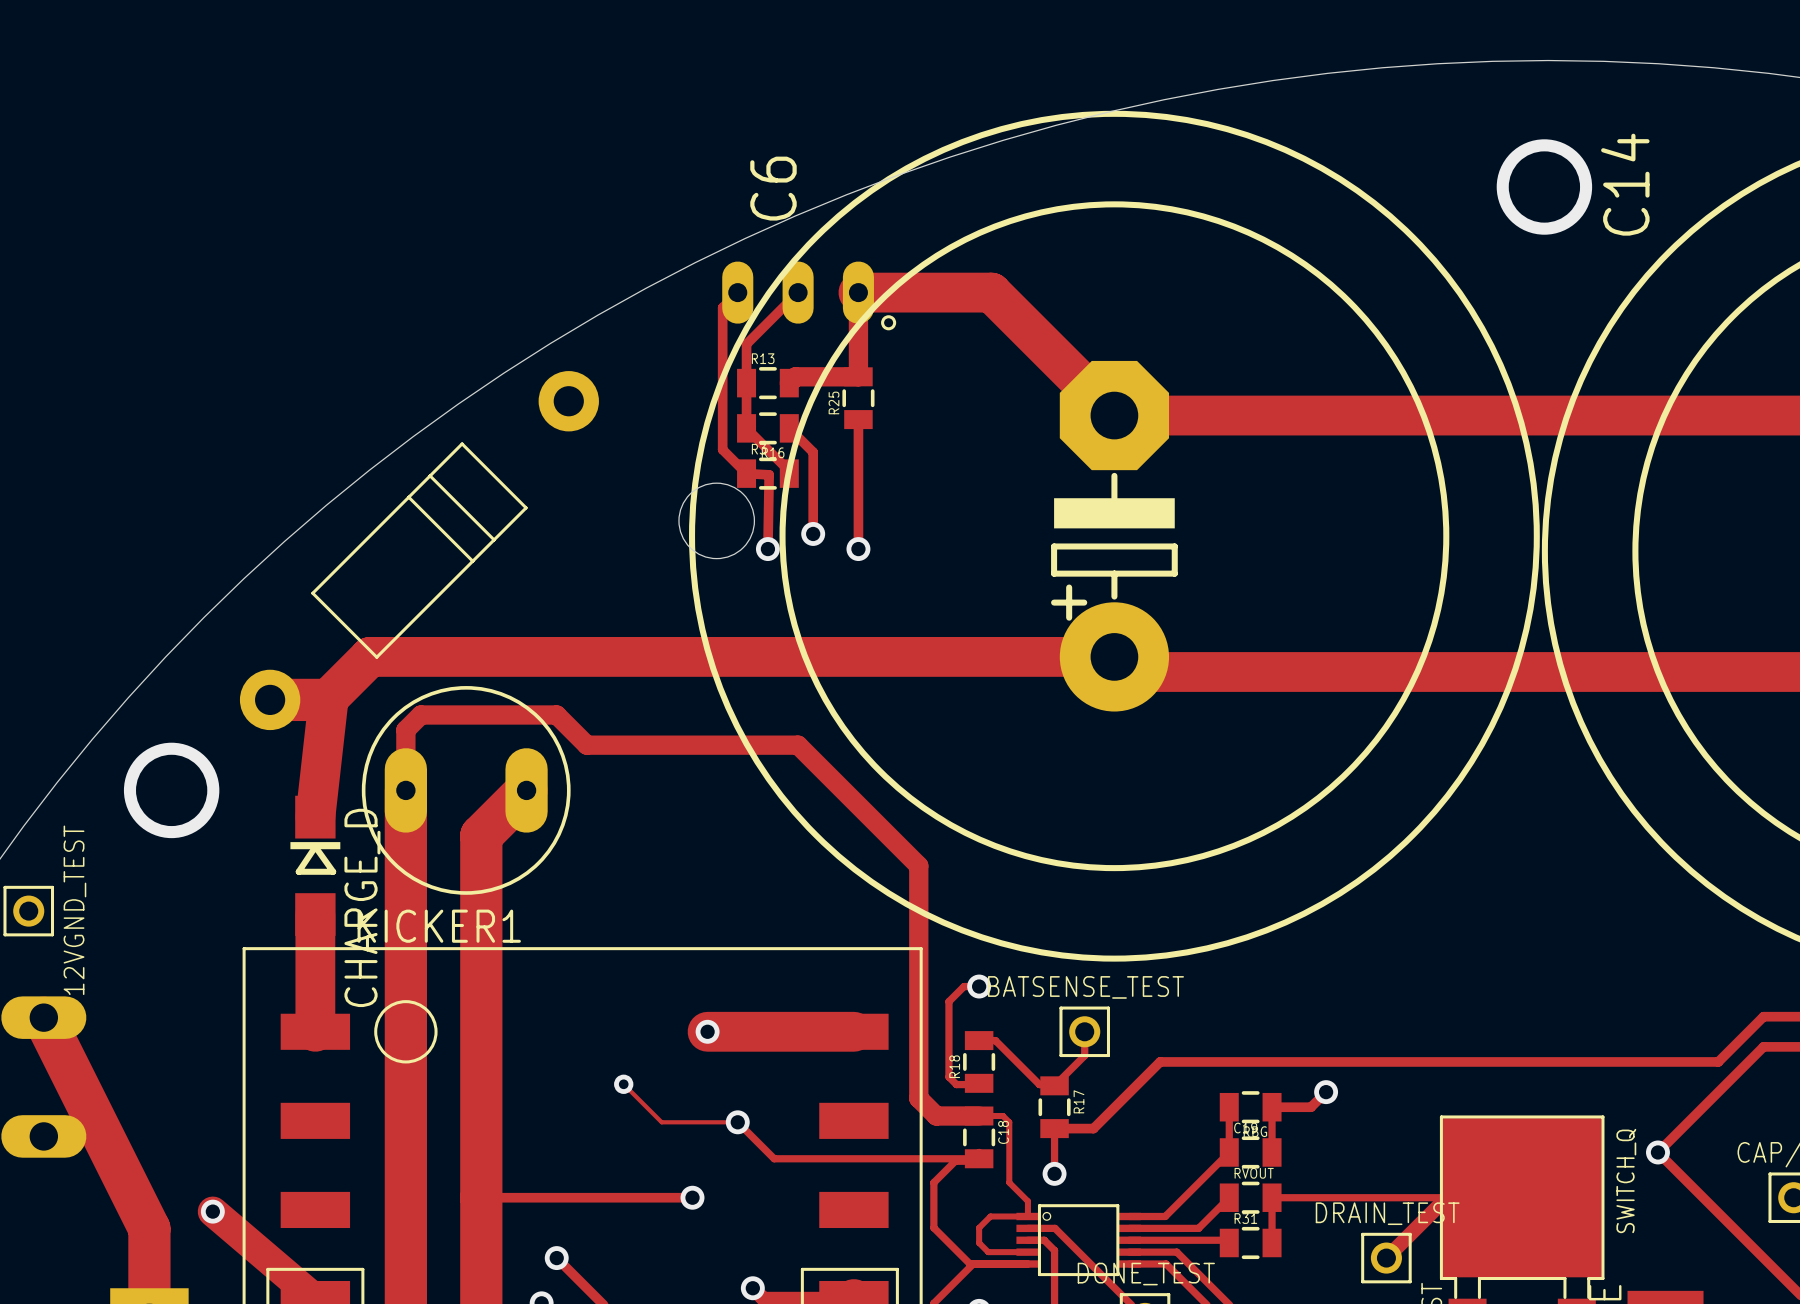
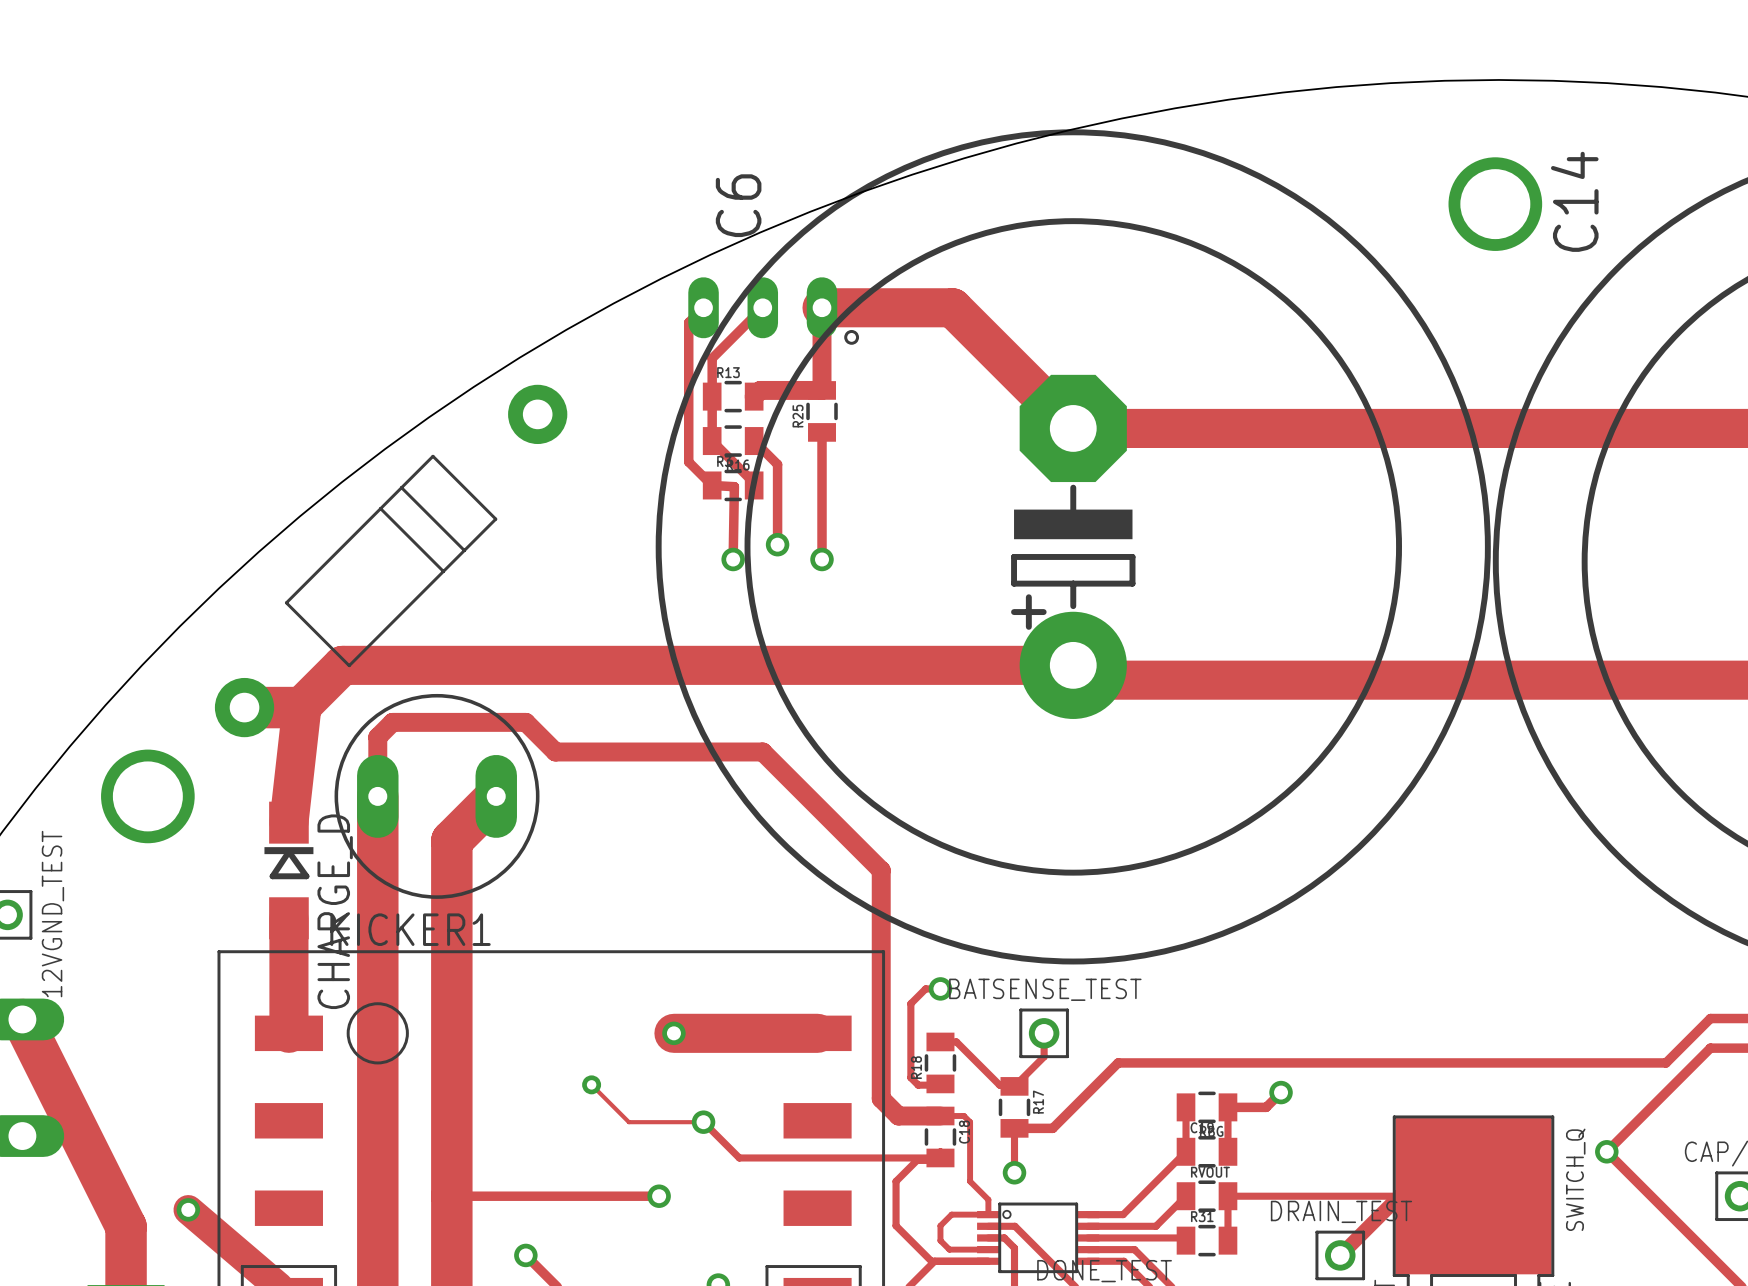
round board edge: [678, 483, 755, 559] -> none

